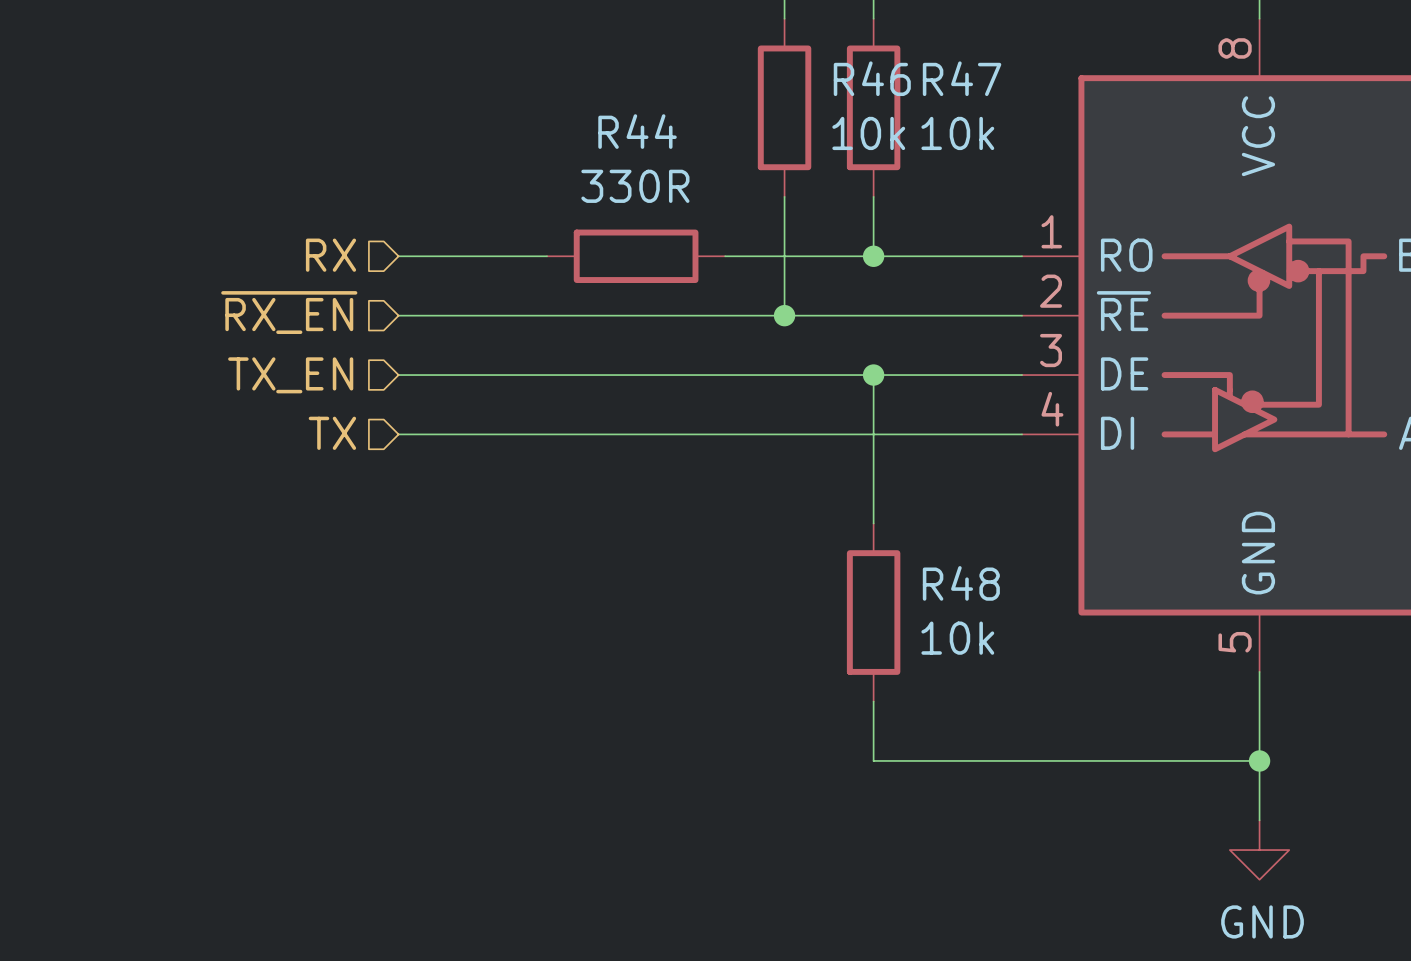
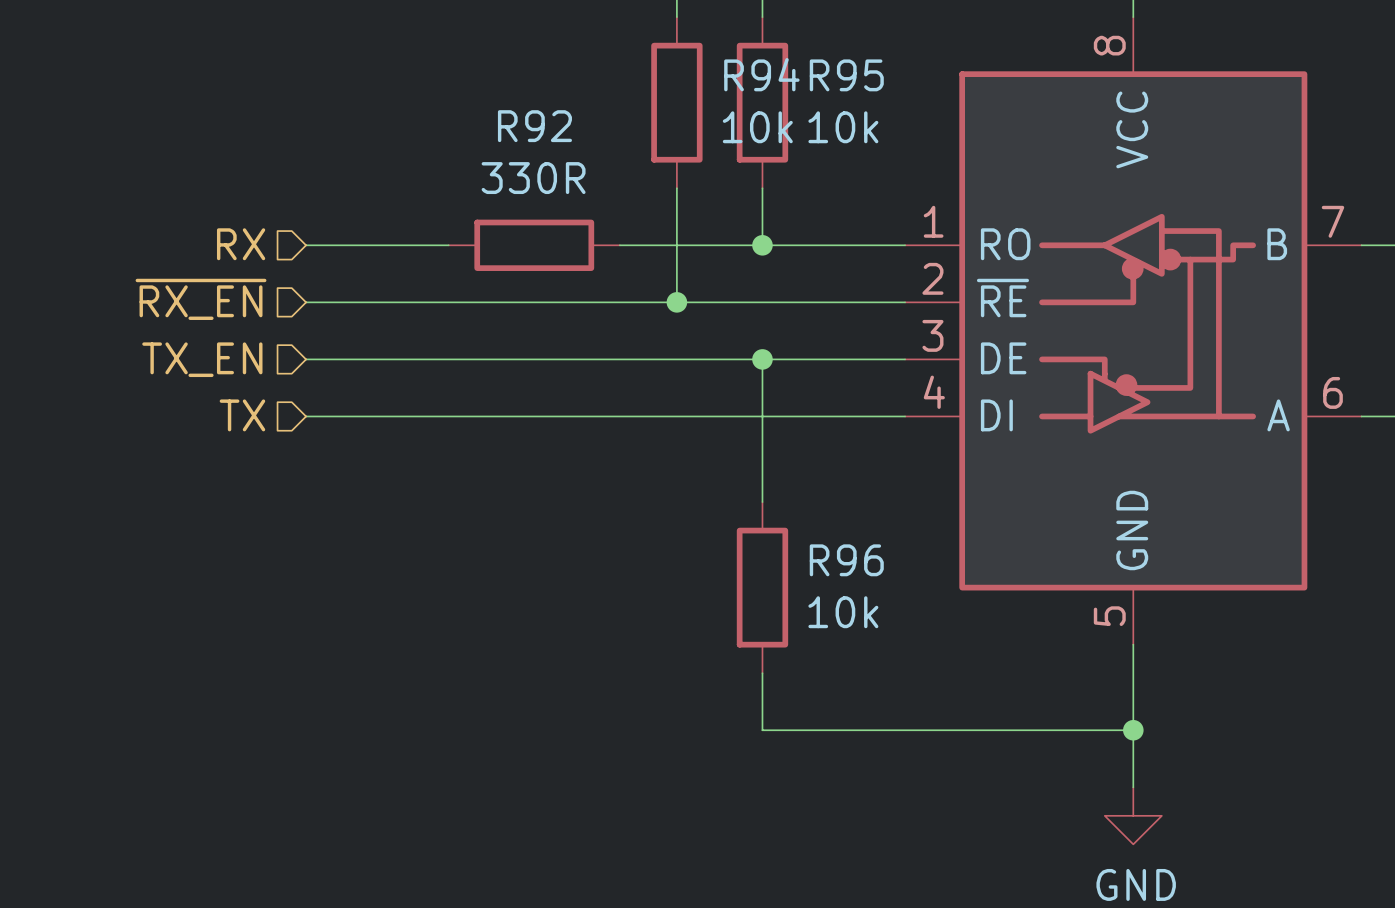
R46 name: R46 (872, 78) -> R94 (761, 74)
R47 name: R47 (962, 78) -> R95 (846, 75)
R44 name: R44 (637, 131) -> R92 (534, 126)
R48 name: R48 (961, 583) -> R96 (846, 560)

